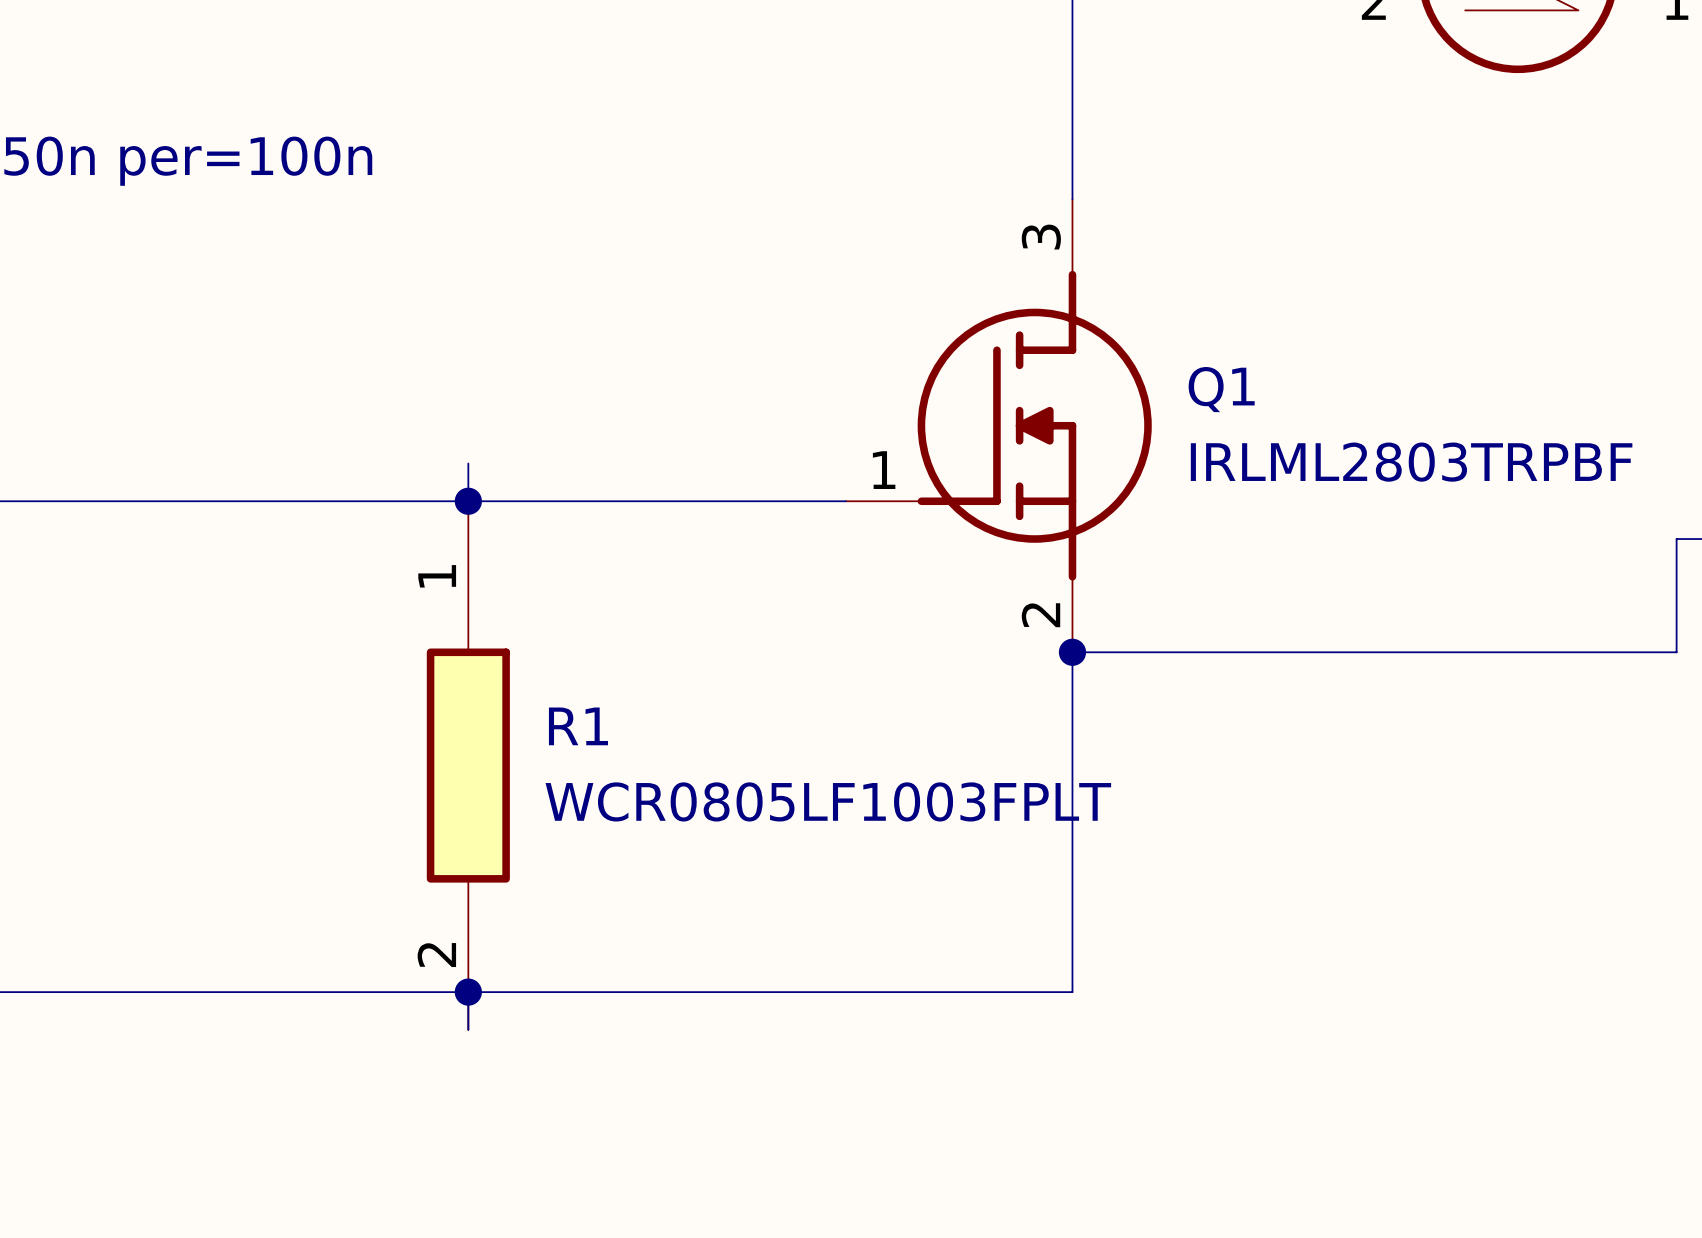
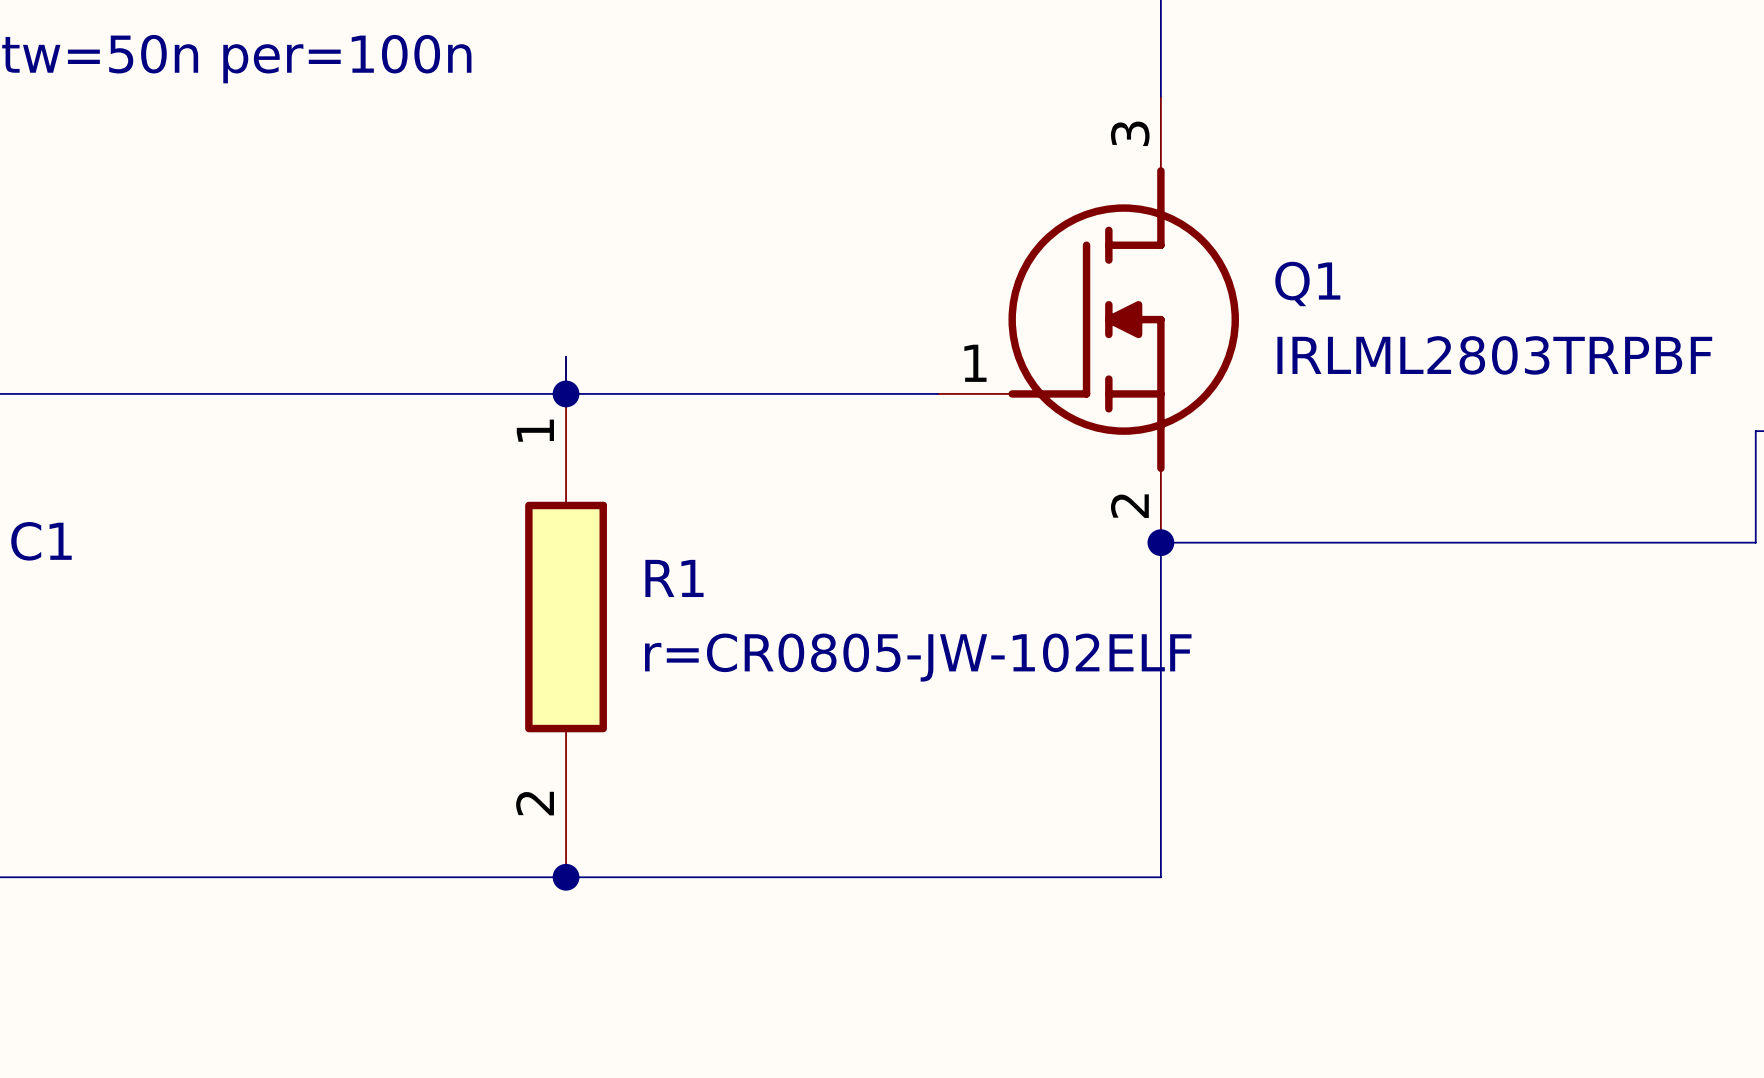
R1 position: (468, 765) -> (566, 617)
R1 value: WCR0805LF1003FPLT (828, 801) -> r=CR0805-JW-102ELF (918, 657)
wire: (468, 992) (468, 1029) -> none

